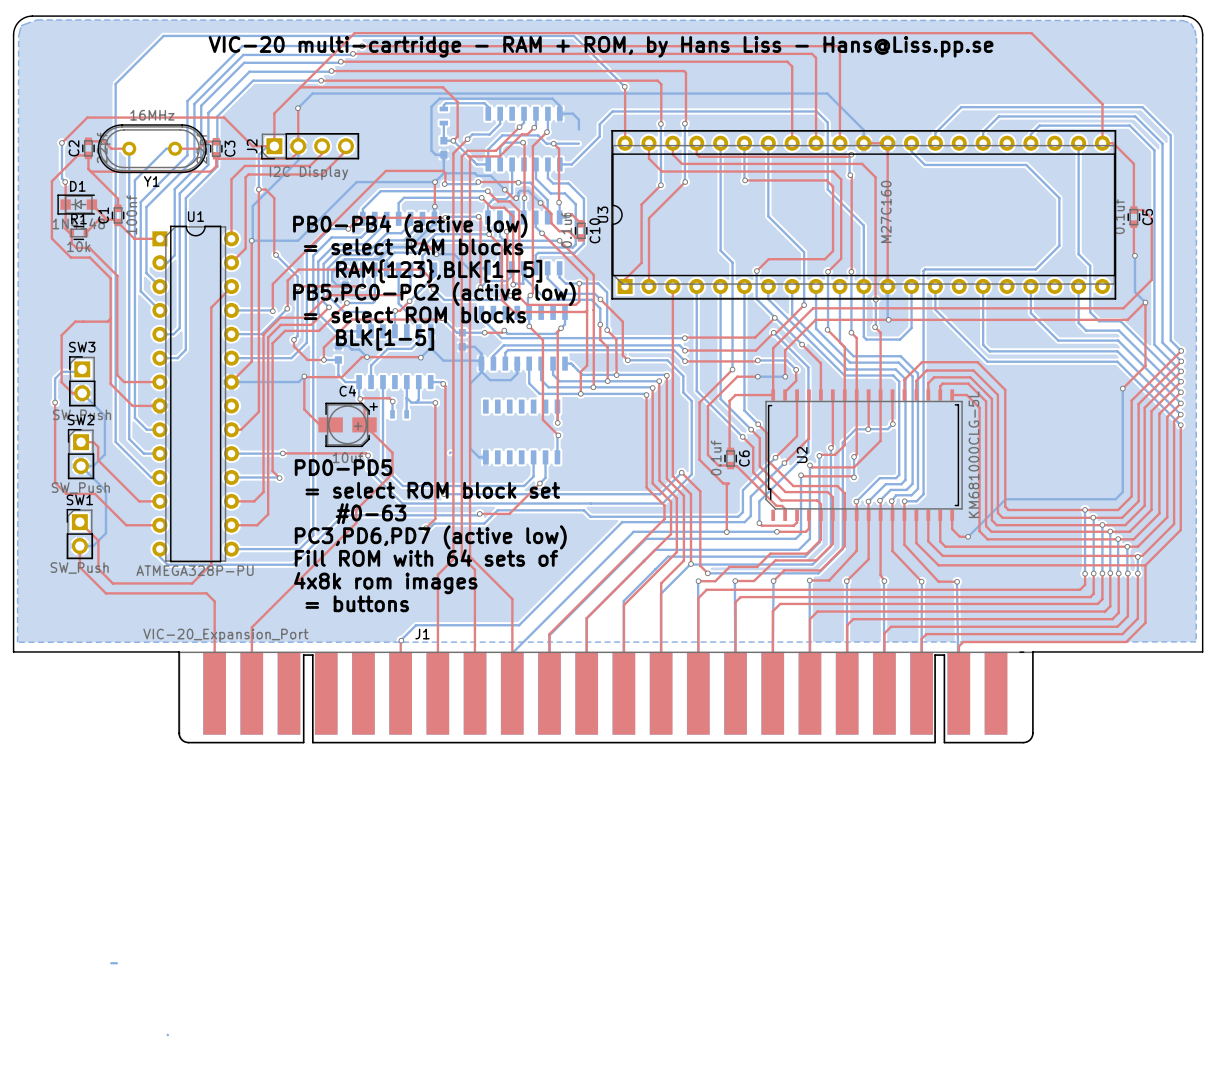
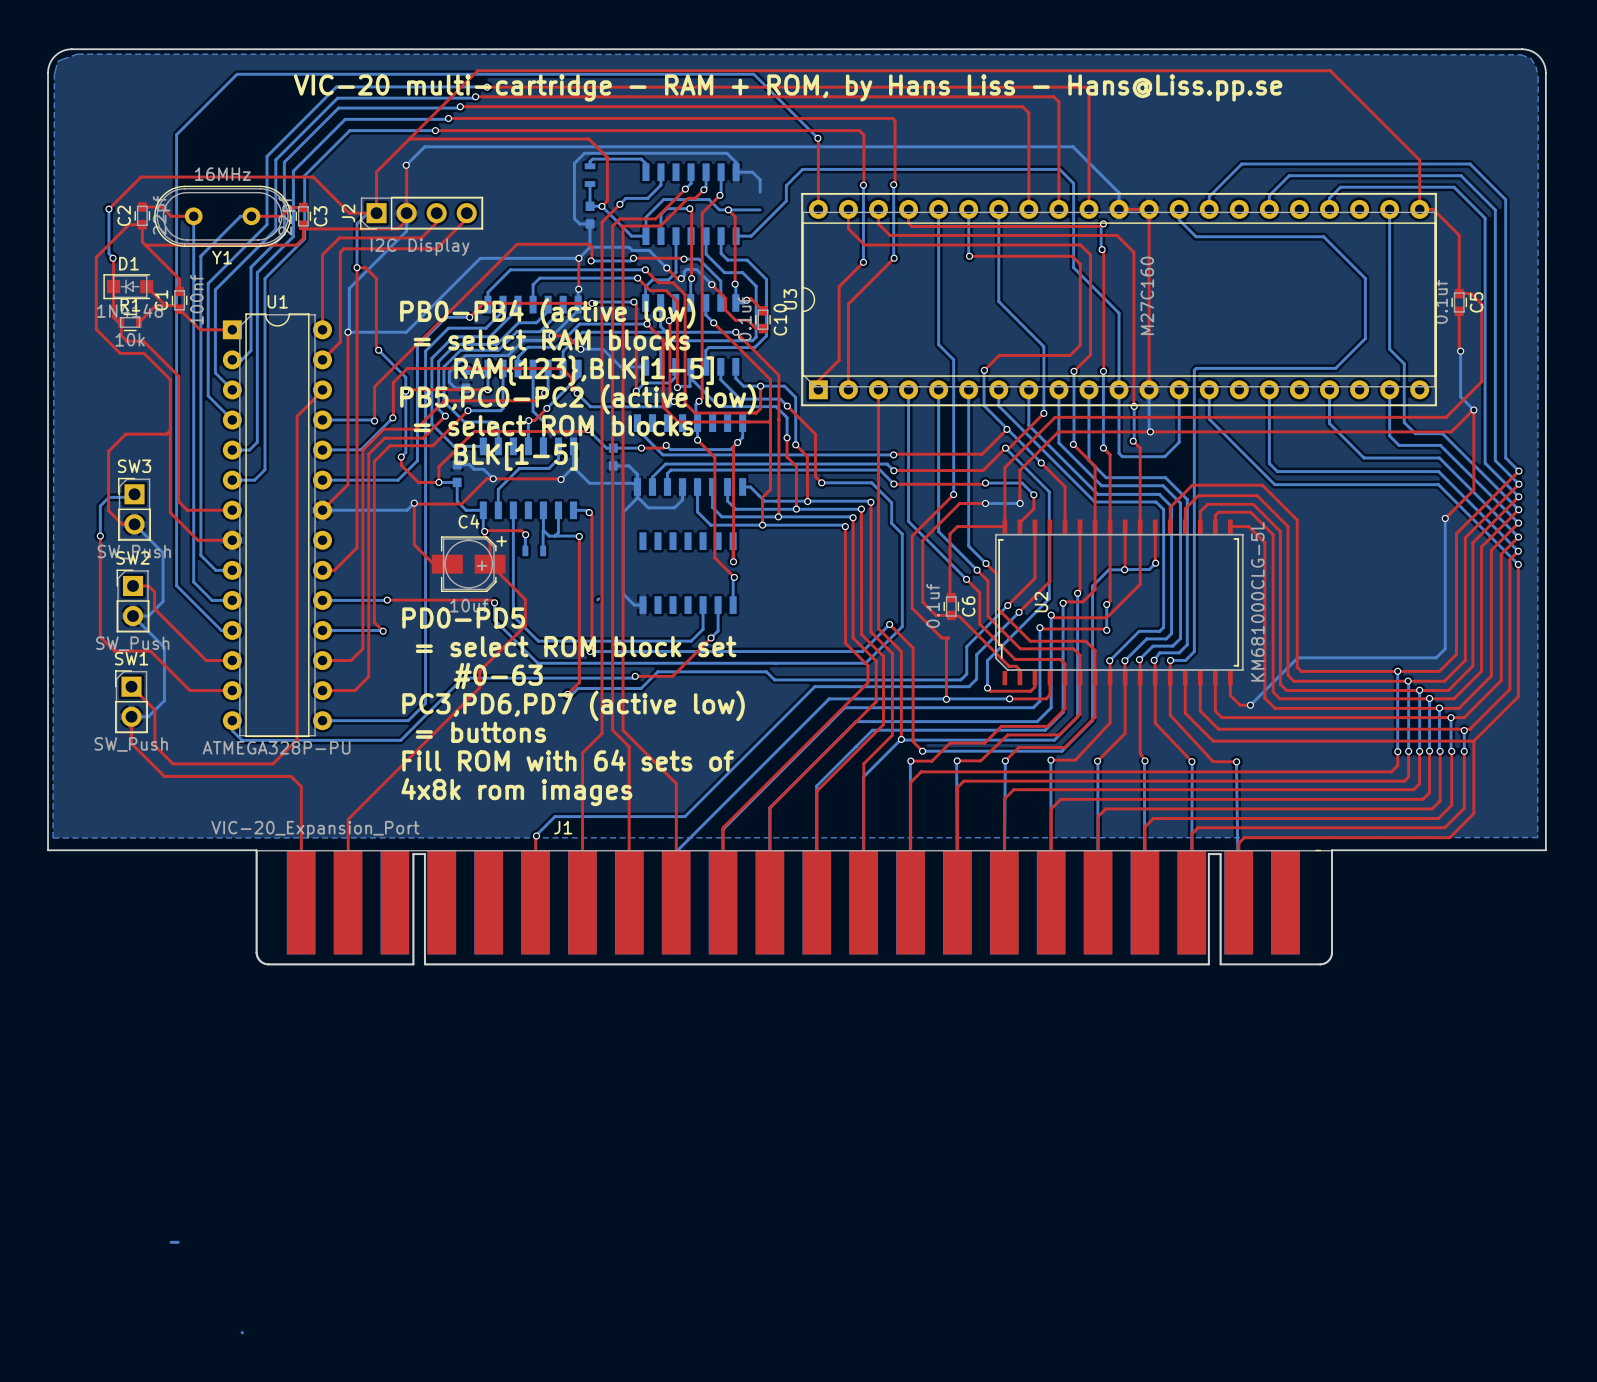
text: Fill ROM with 64 sets of (426, 558) -> = buttons (480, 732)
text: 4x8k rom images (385, 583) -> Fill ROM with 64 sets of (568, 760)
text: = buttons (357, 603) -> 4x8k rom images (516, 792)

